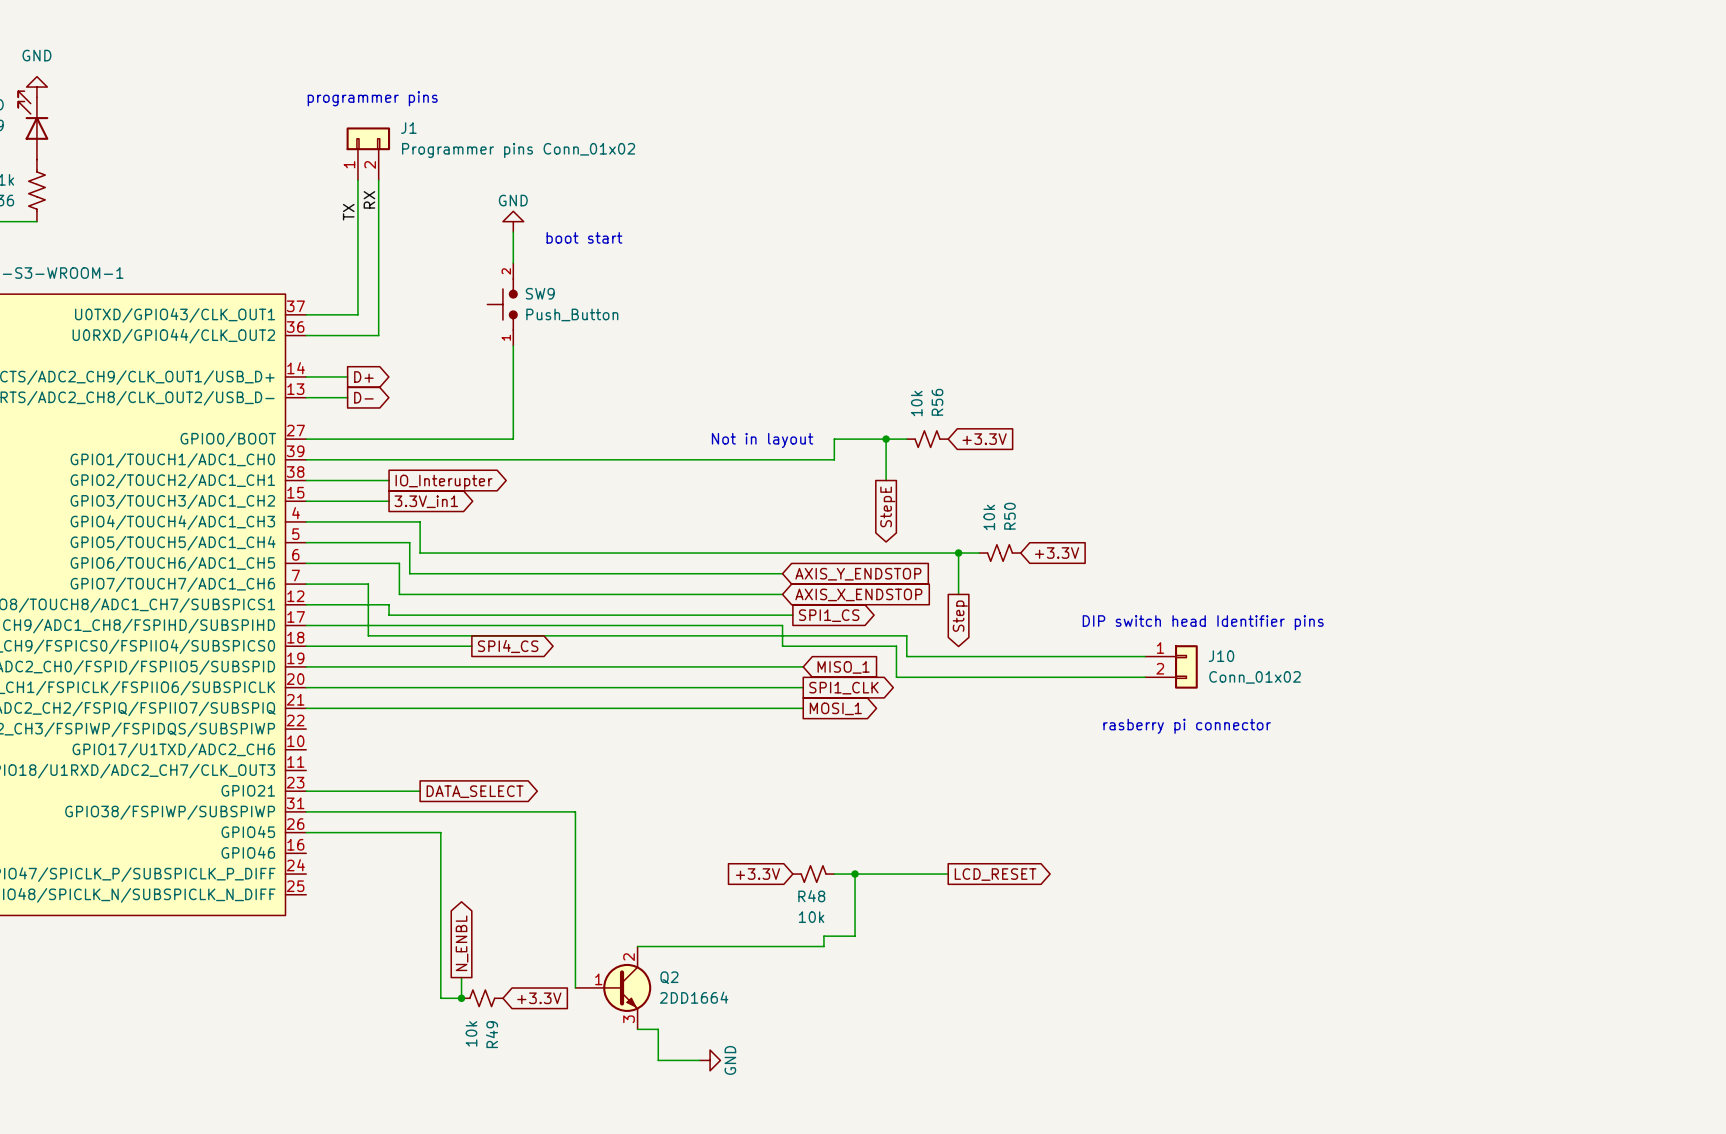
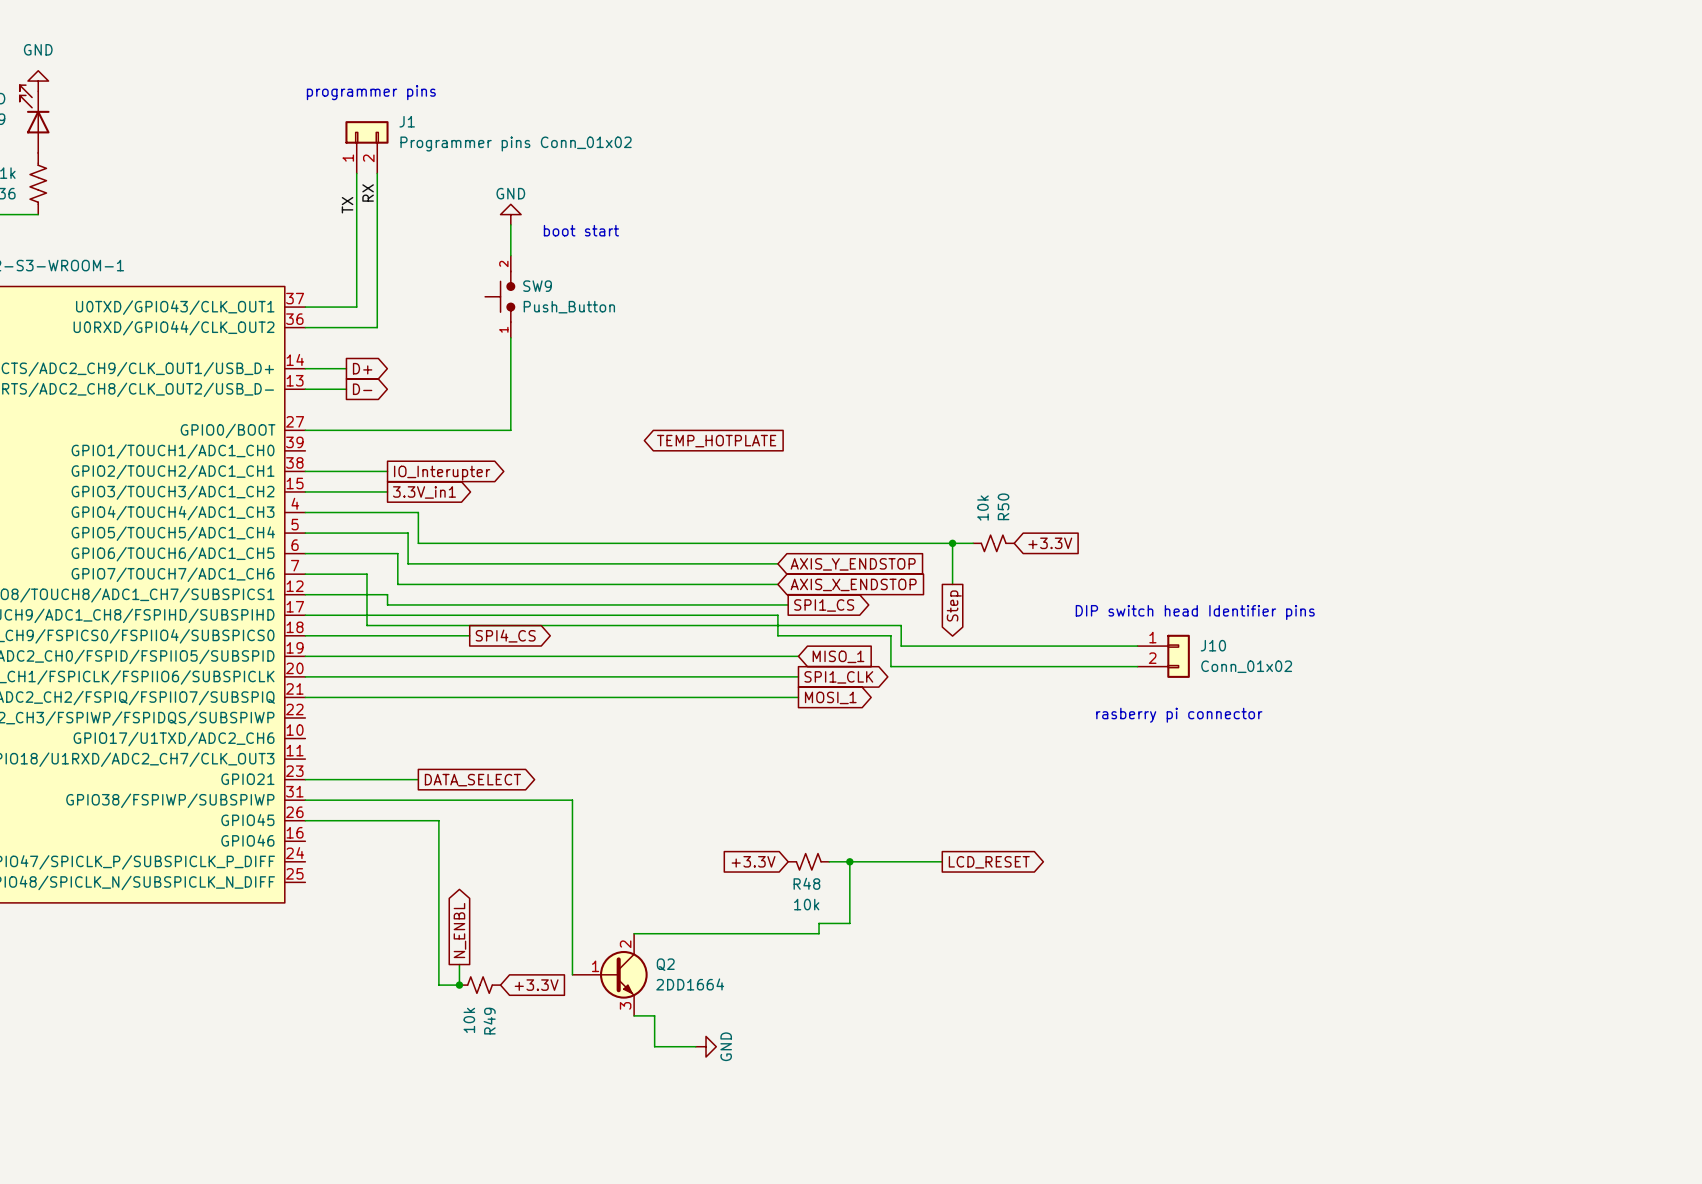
wire: (886, 439) (886, 480) -> none
junction: (886, 439) -> none
wire: (906, 439) (834, 439) (834, 459) (306, 459) -> none
R56: 10k (927, 439) -> none
global label: +3.3V (984, 439) -> none
text: Not in layout (762, 440) -> none
global label: none -> TEMP_HOTPLATE (716, 441)
global label: StepE (887, 506) -> none

